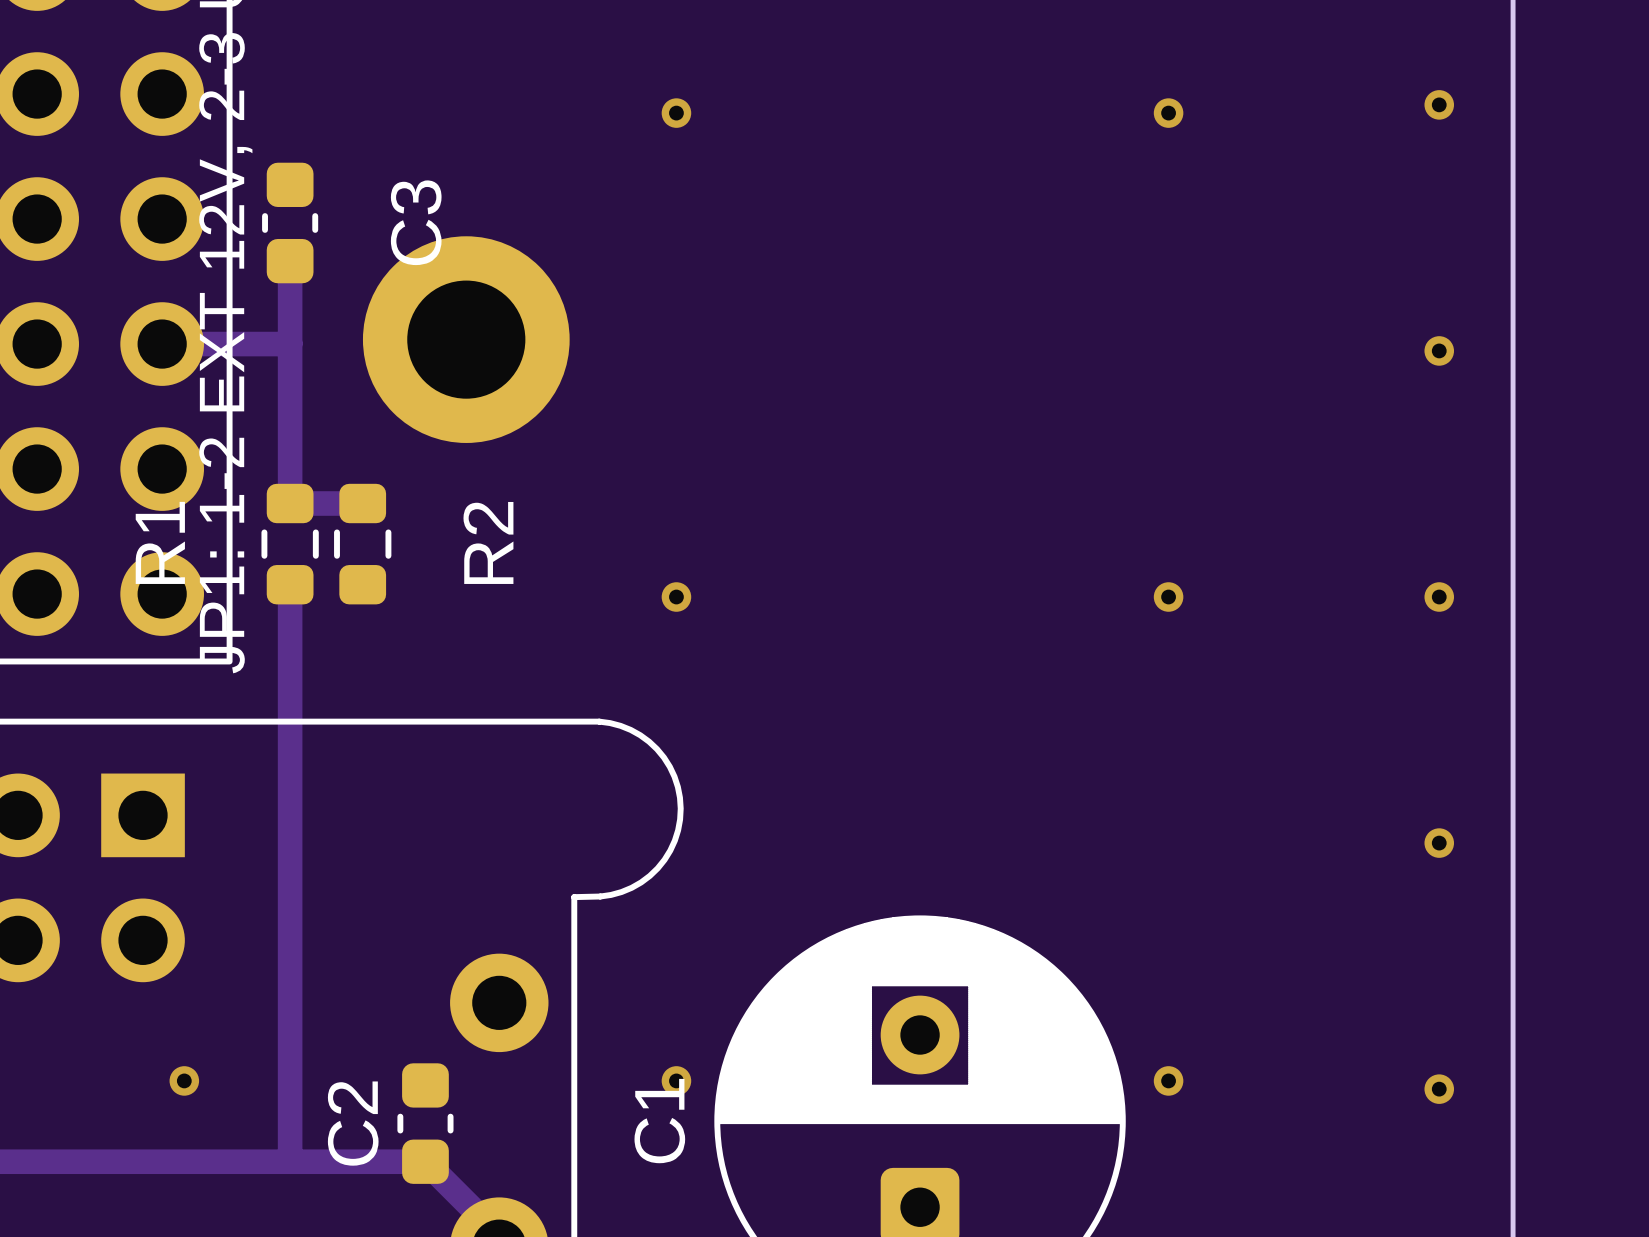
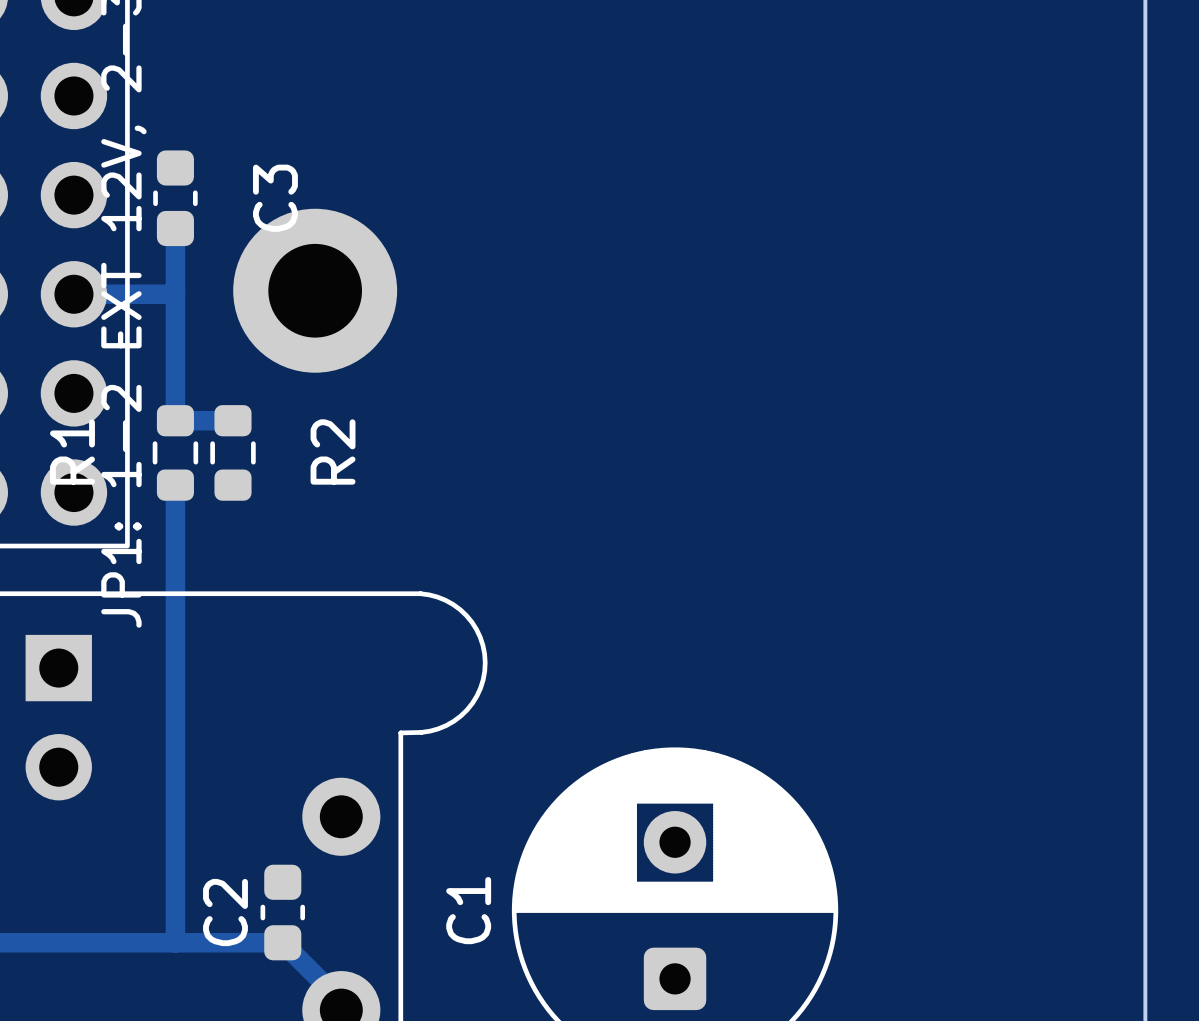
via: (1439, 104) -> none
via: (676, 113) -> none
via: (1168, 113) -> none
via: (1439, 350) -> none
via: (676, 597) -> none
via: (1168, 597) -> none
via: (1439, 597) -> none
via: (1439, 843) -> none
via: (184, 1080) -> none
via: (676, 1080) -> none
via: (1168, 1080) -> none
via: (1439, 1089) -> none

